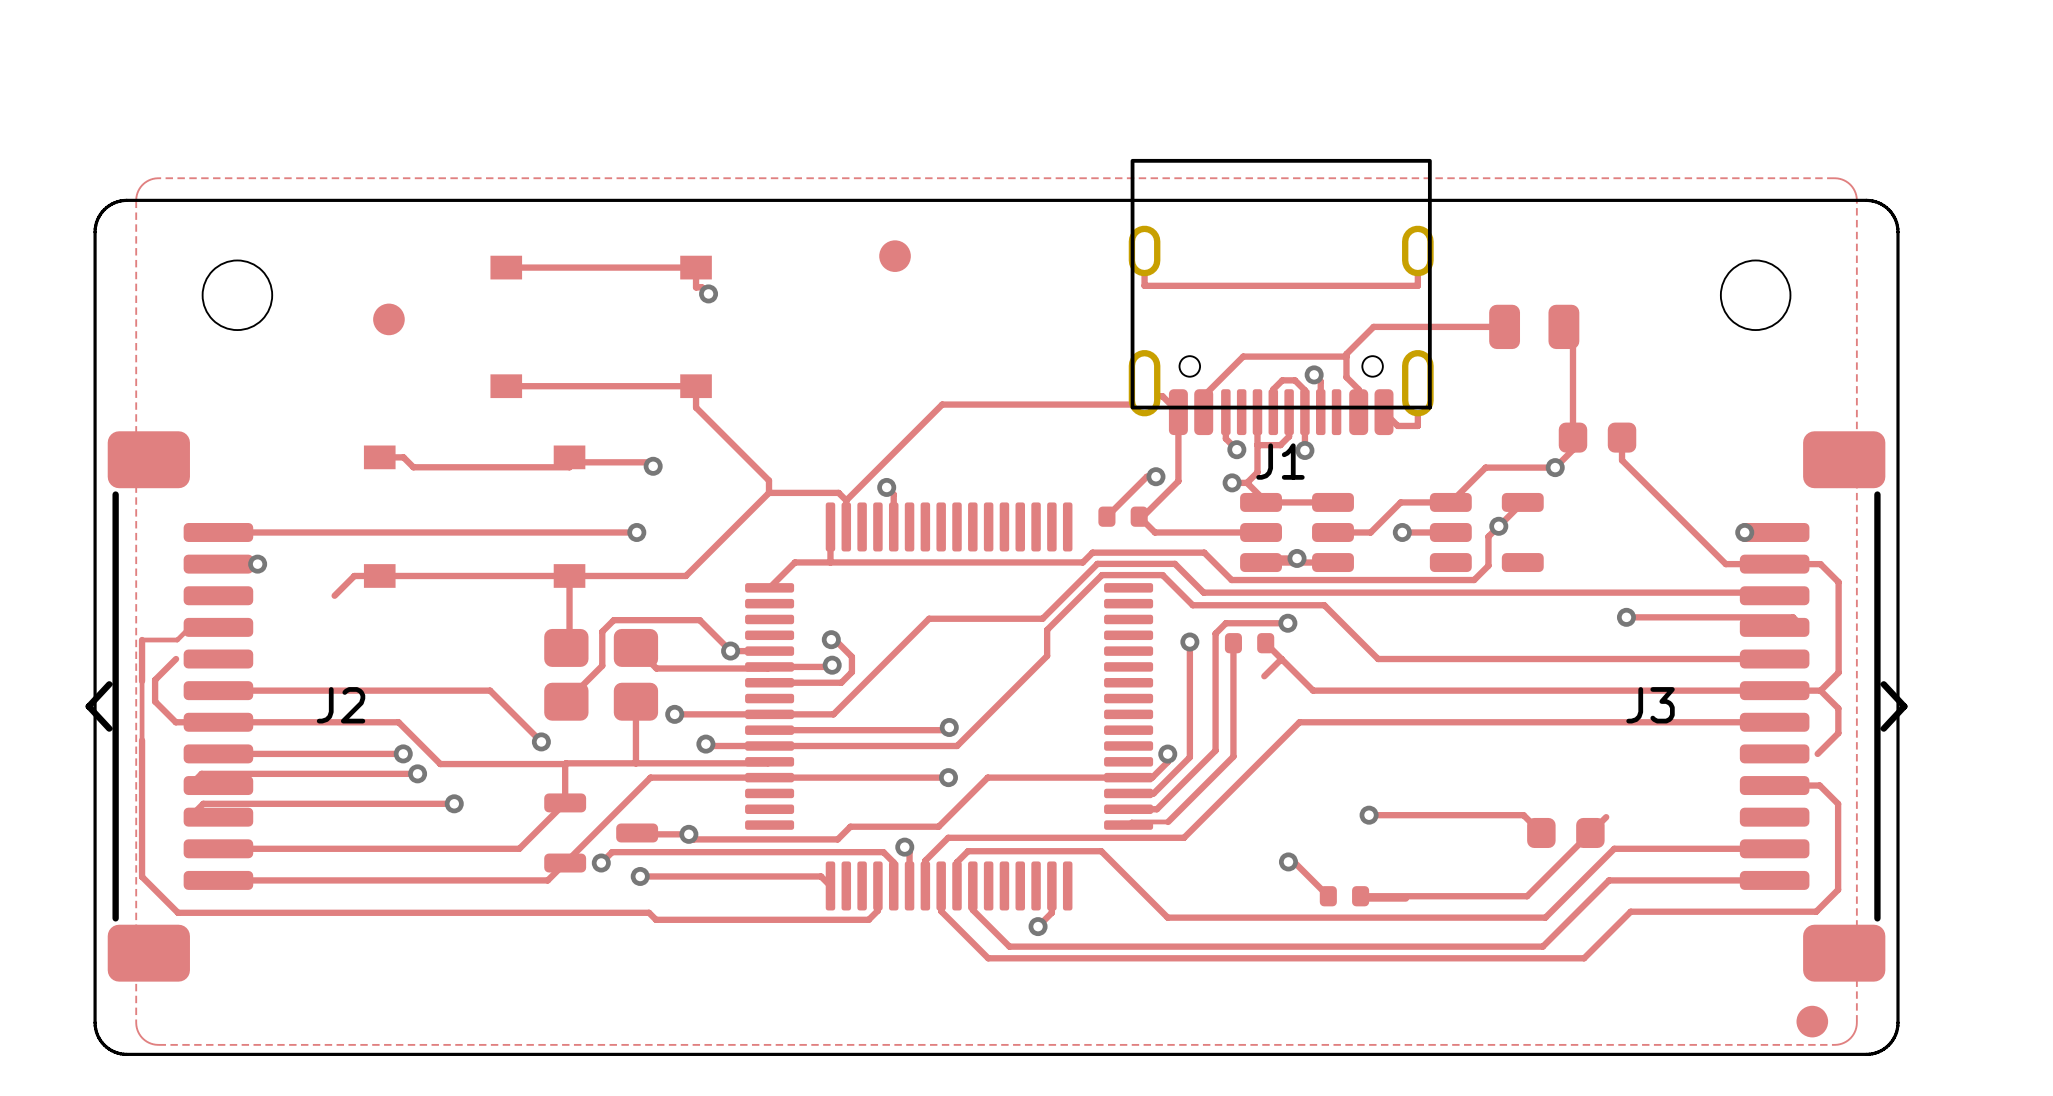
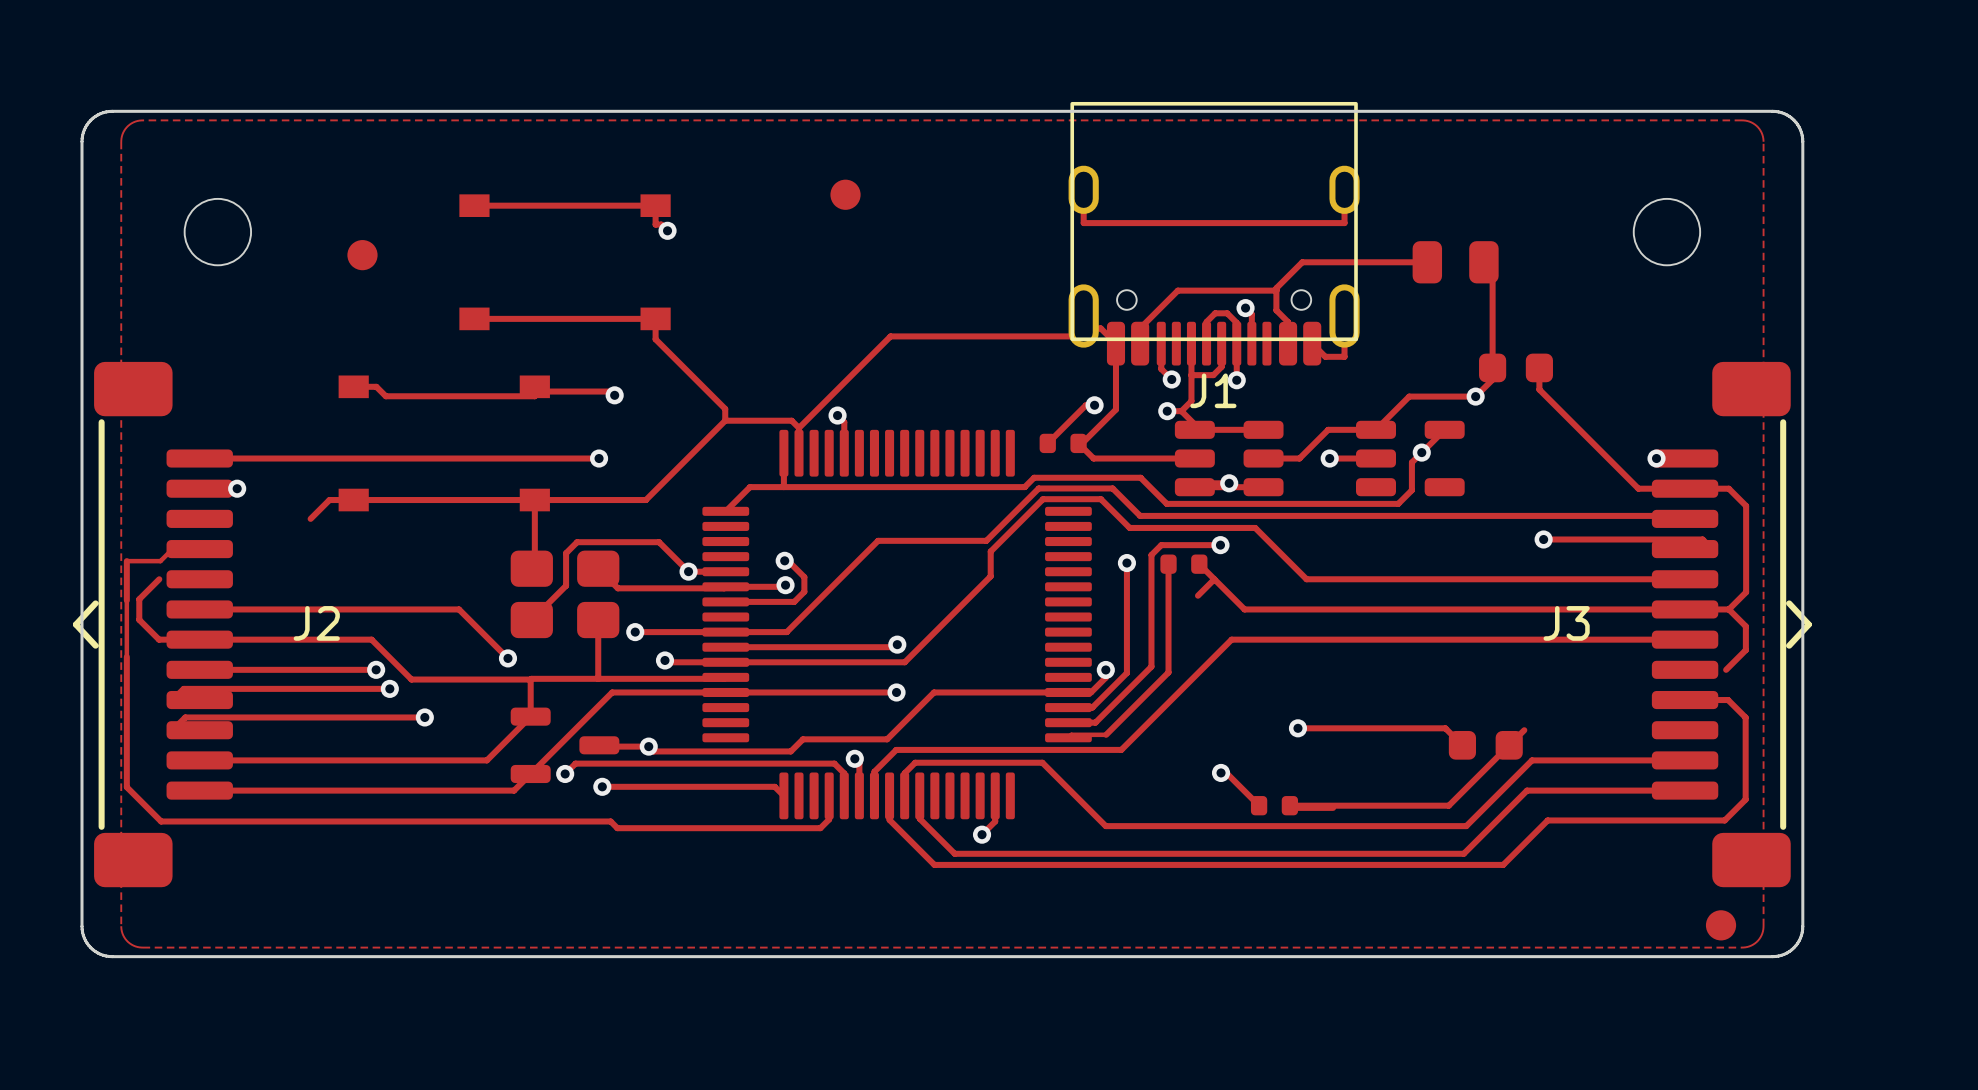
board edge: (95, 232) (97, 219) (104, 209) (114, 202) (126, 200) (1866, 200) (1878, 202) (1888, 209) (1895, 219) (1897, 232) -> (82, 171) (82, 138) (85, 127) (97, 114) (112, 111) (1772, 111) (1786, 114) (1799, 127) (1802, 138) (1802, 171)

